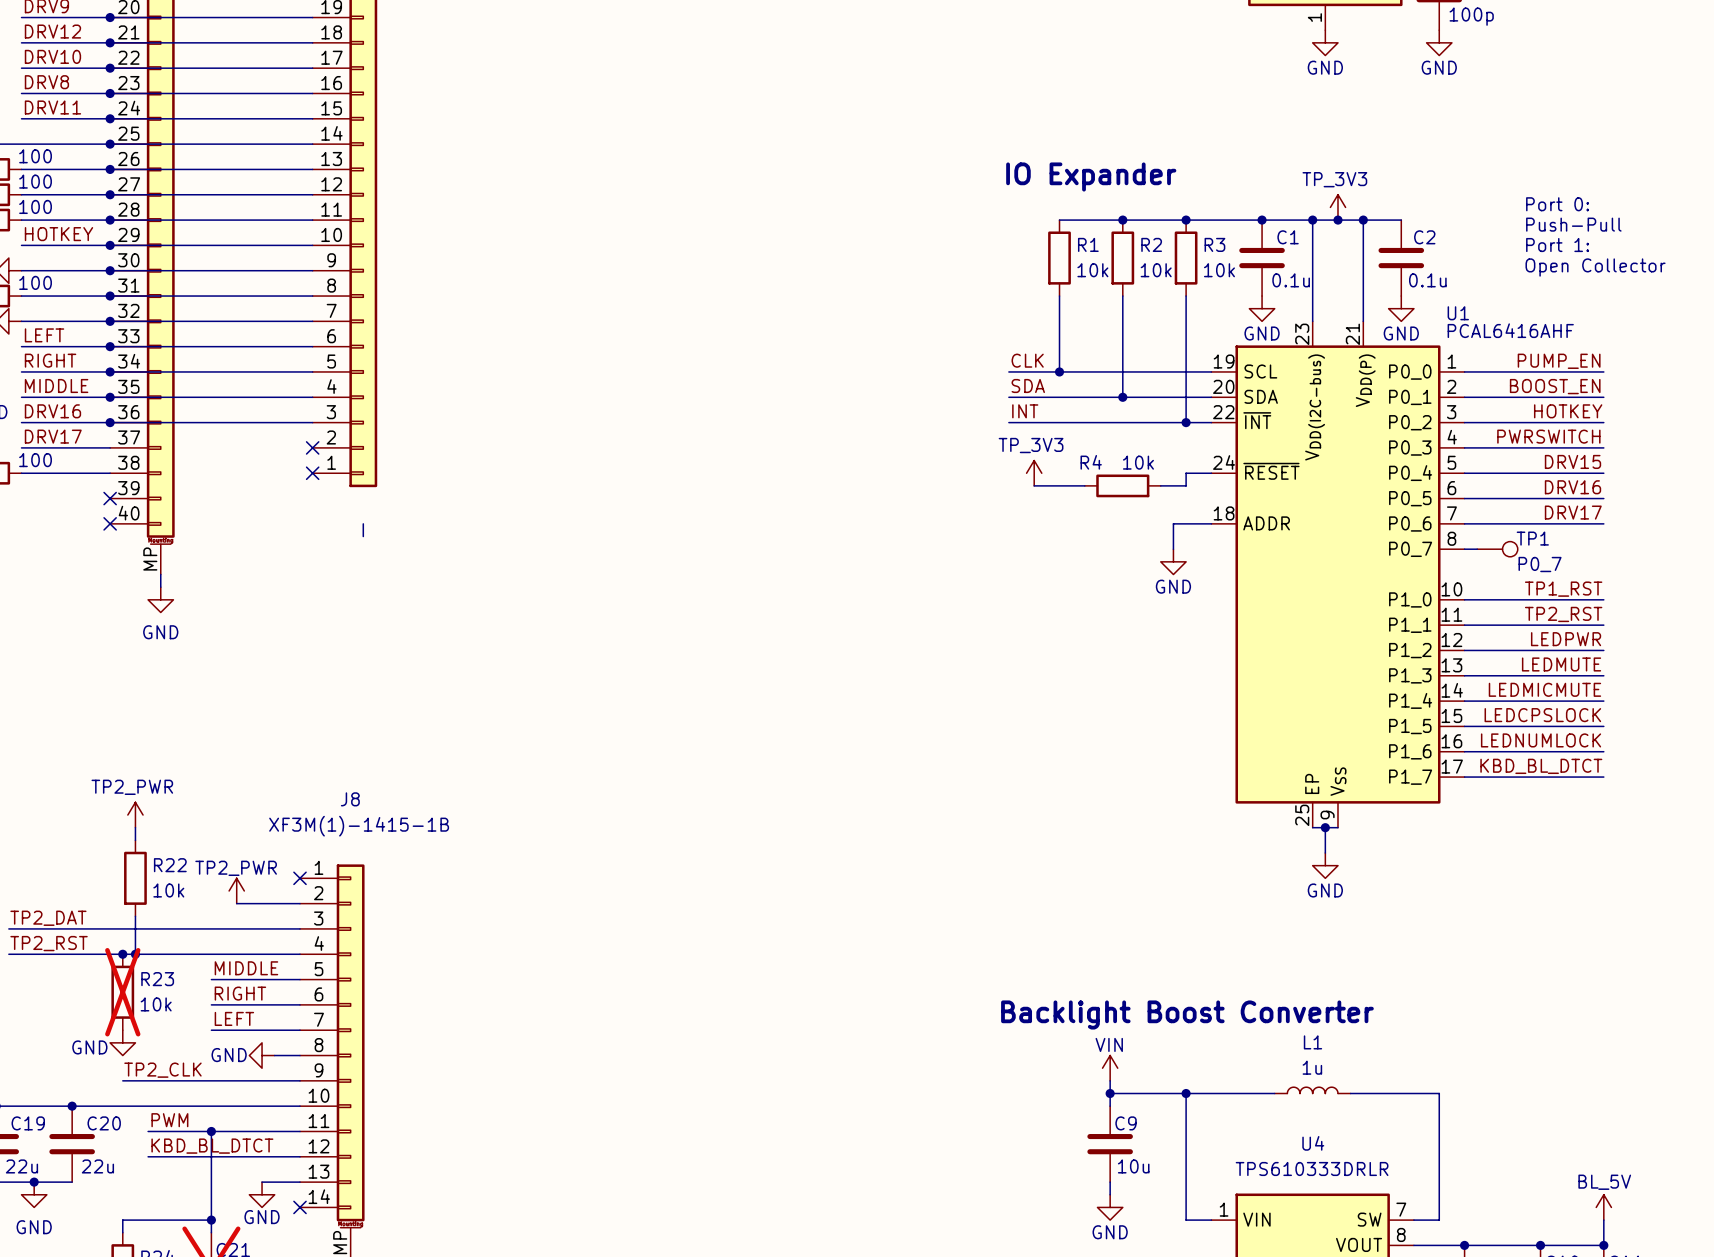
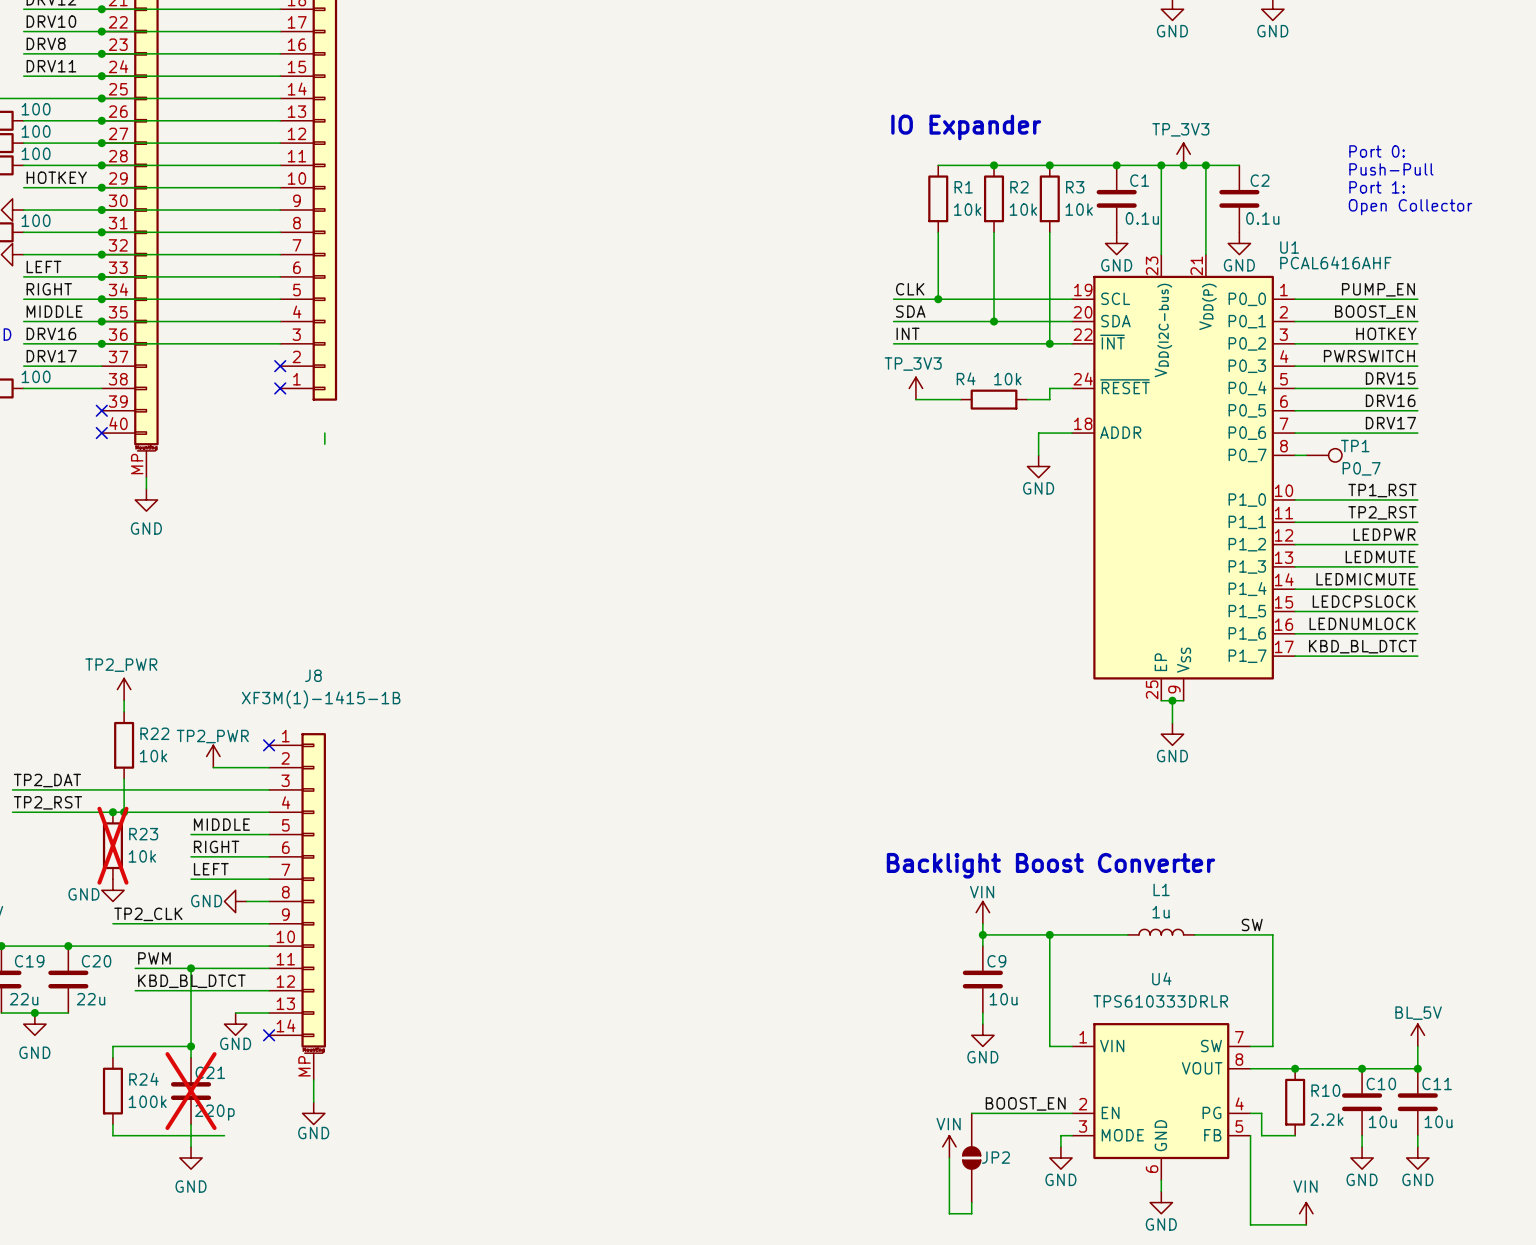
label: none -> SW (1252, 924)

